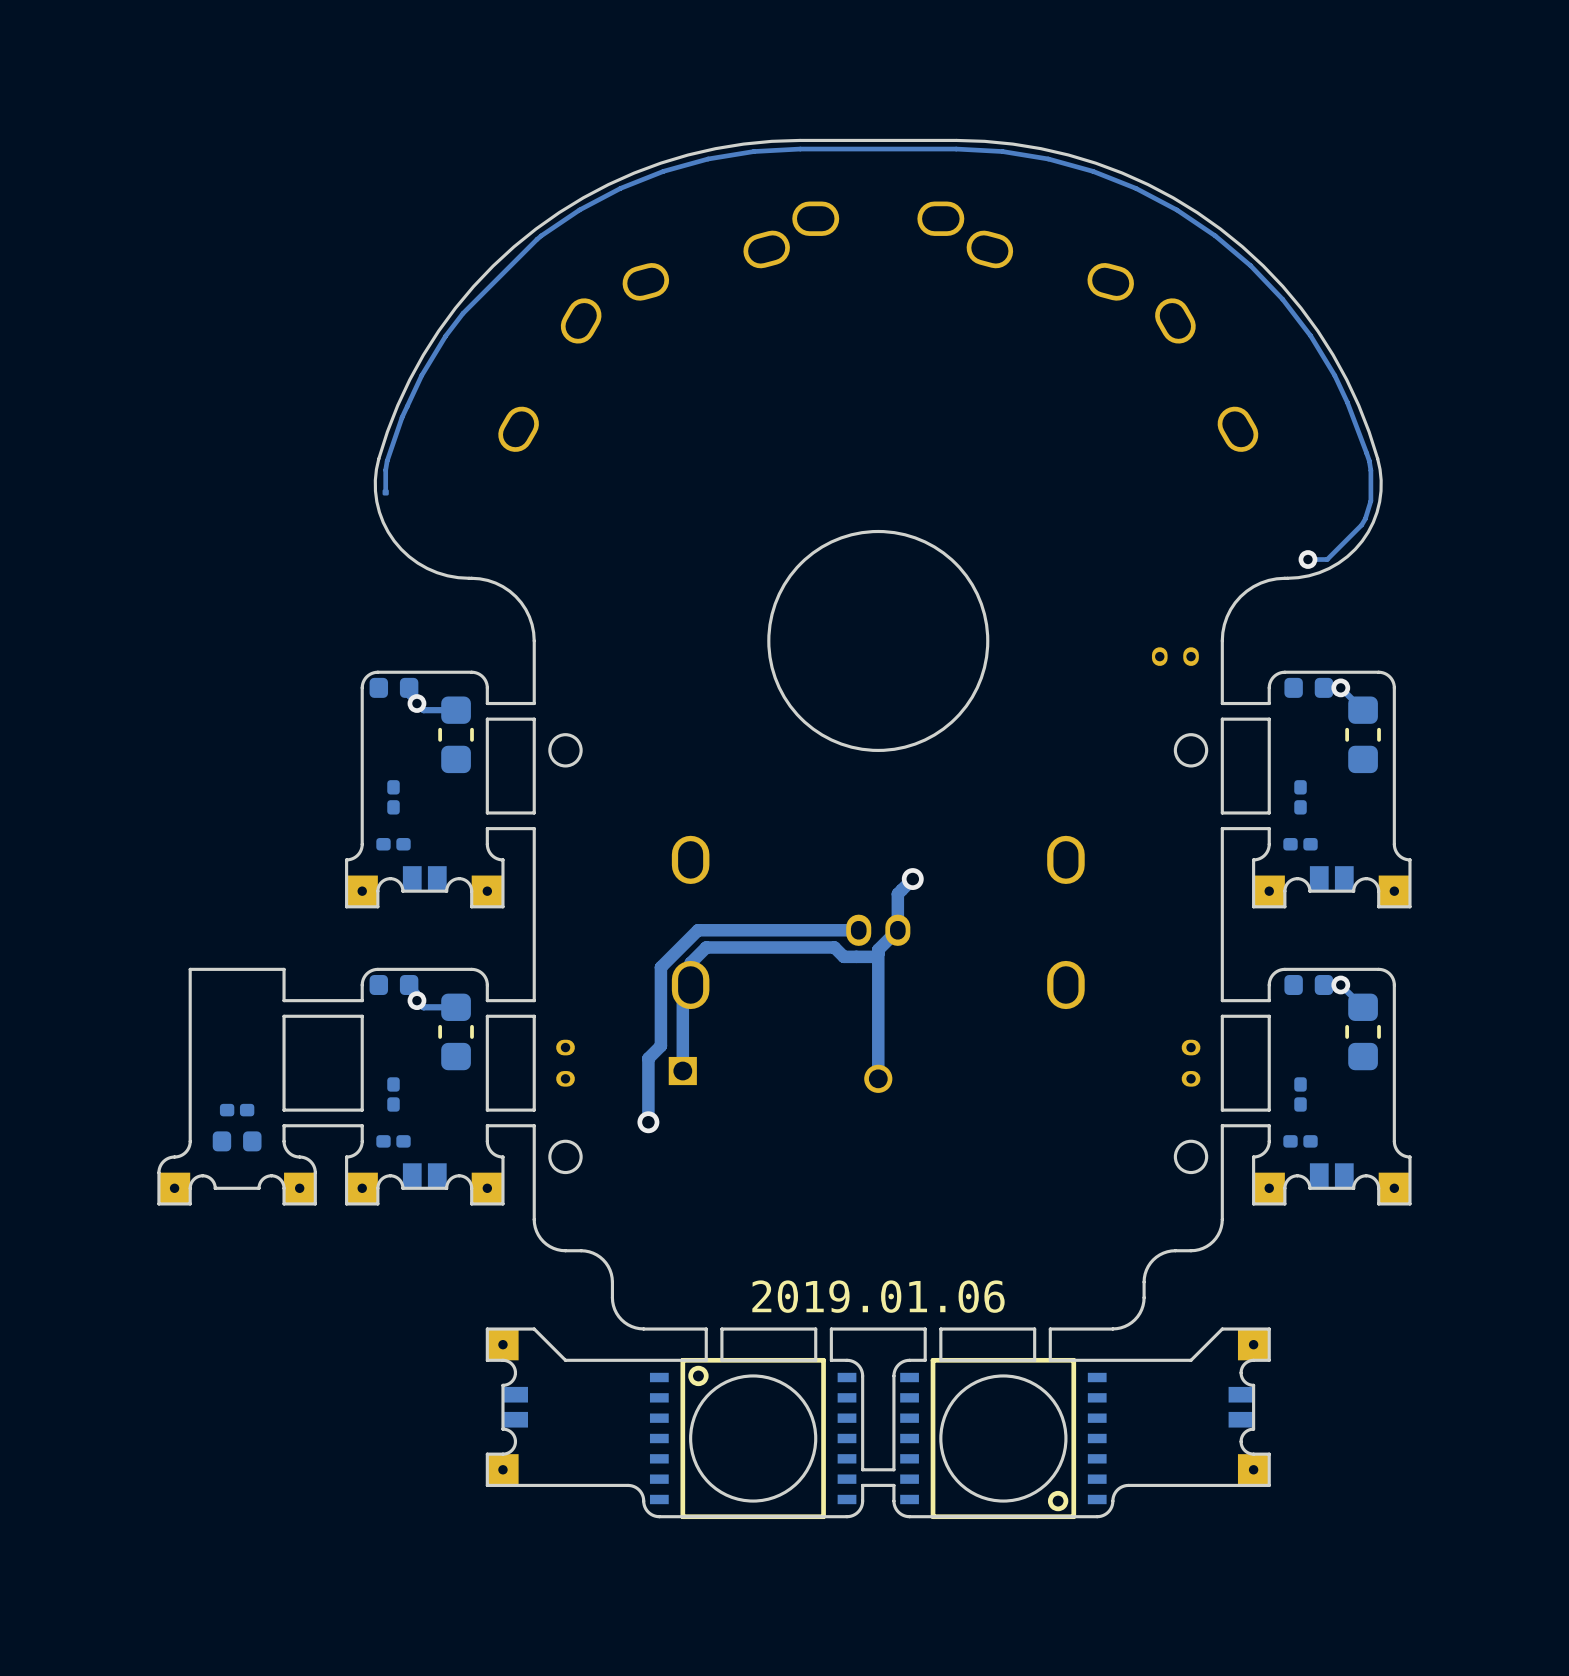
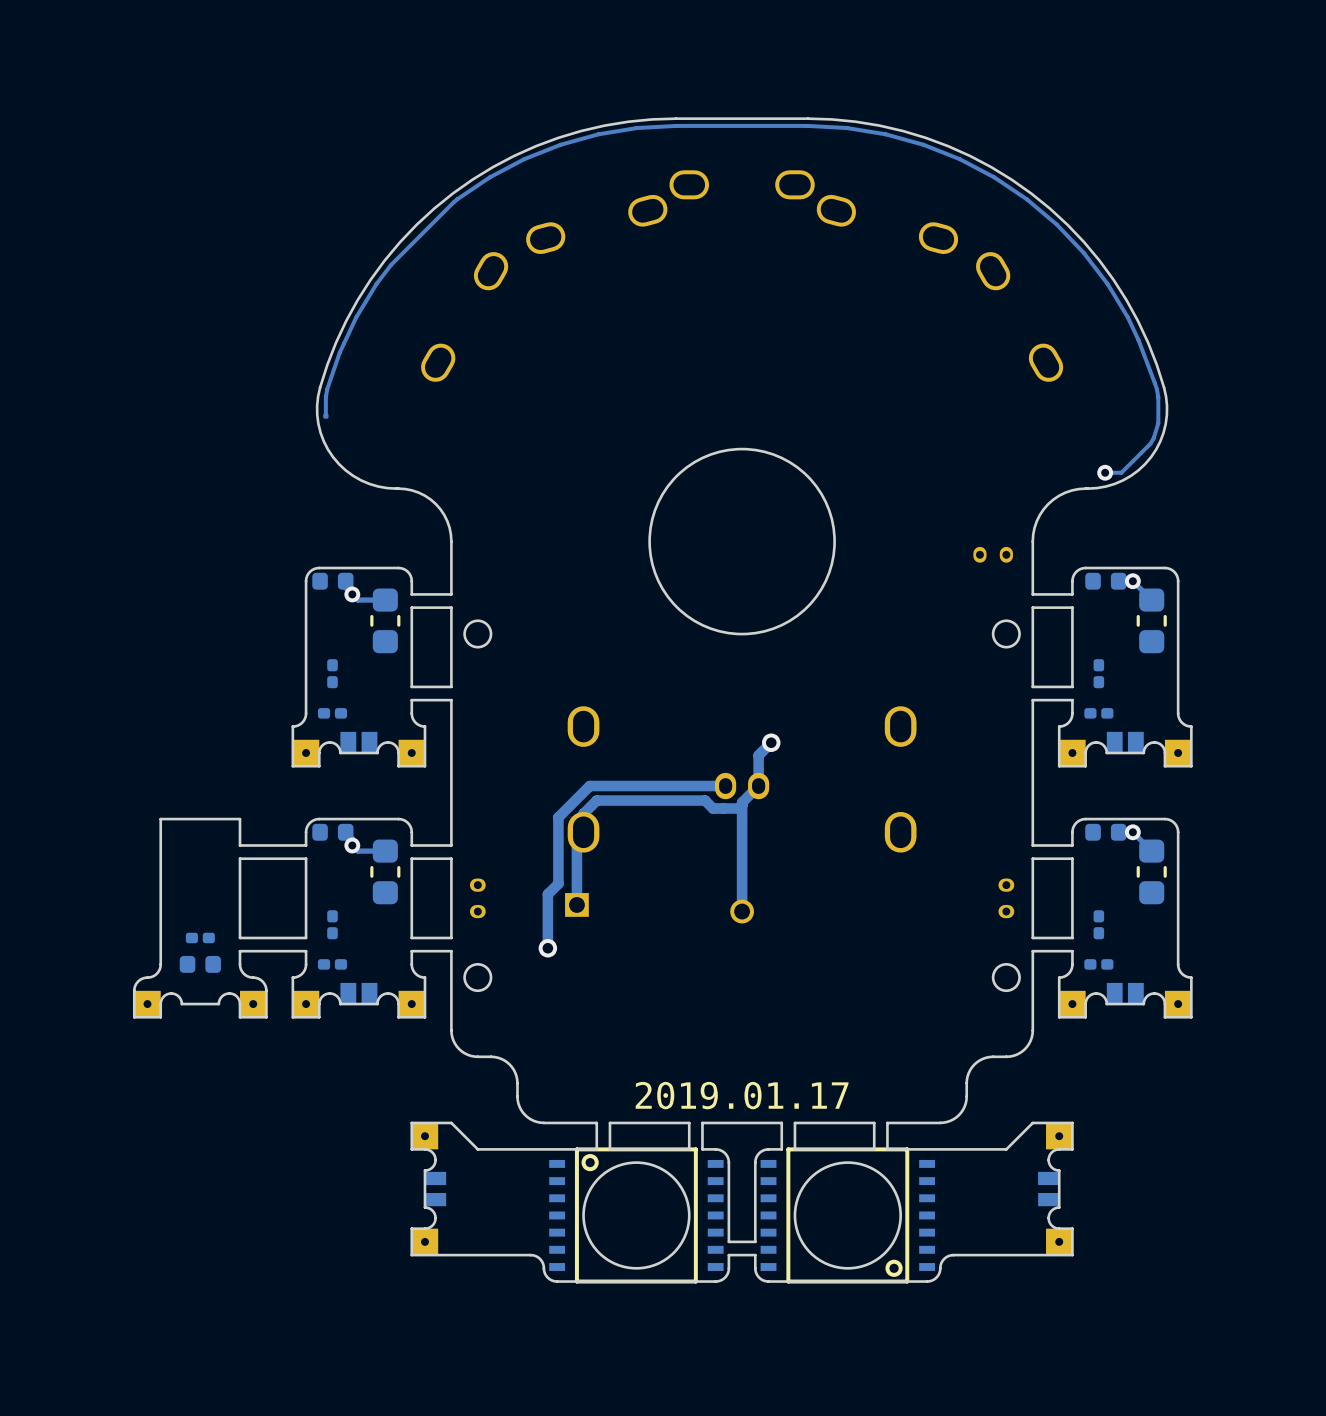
text: 2019.01.06 (878, 1296) -> 2019.01.17 (742, 1095)

